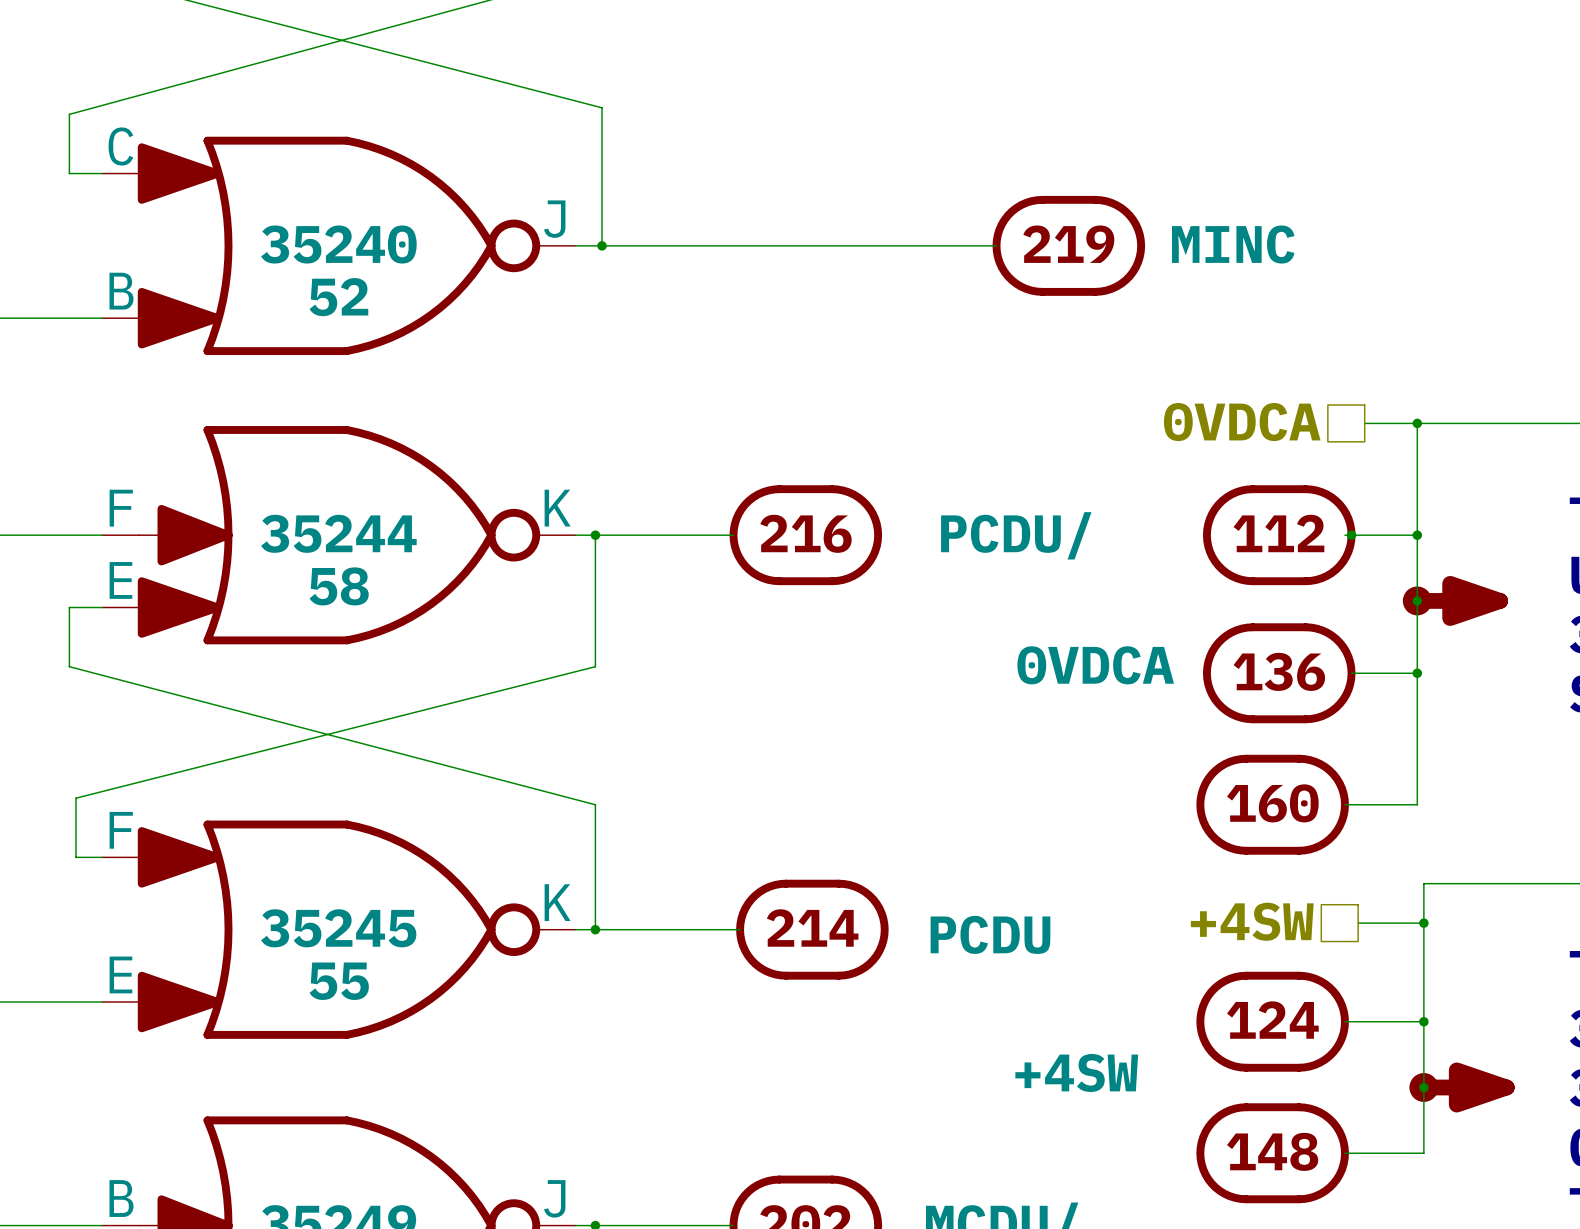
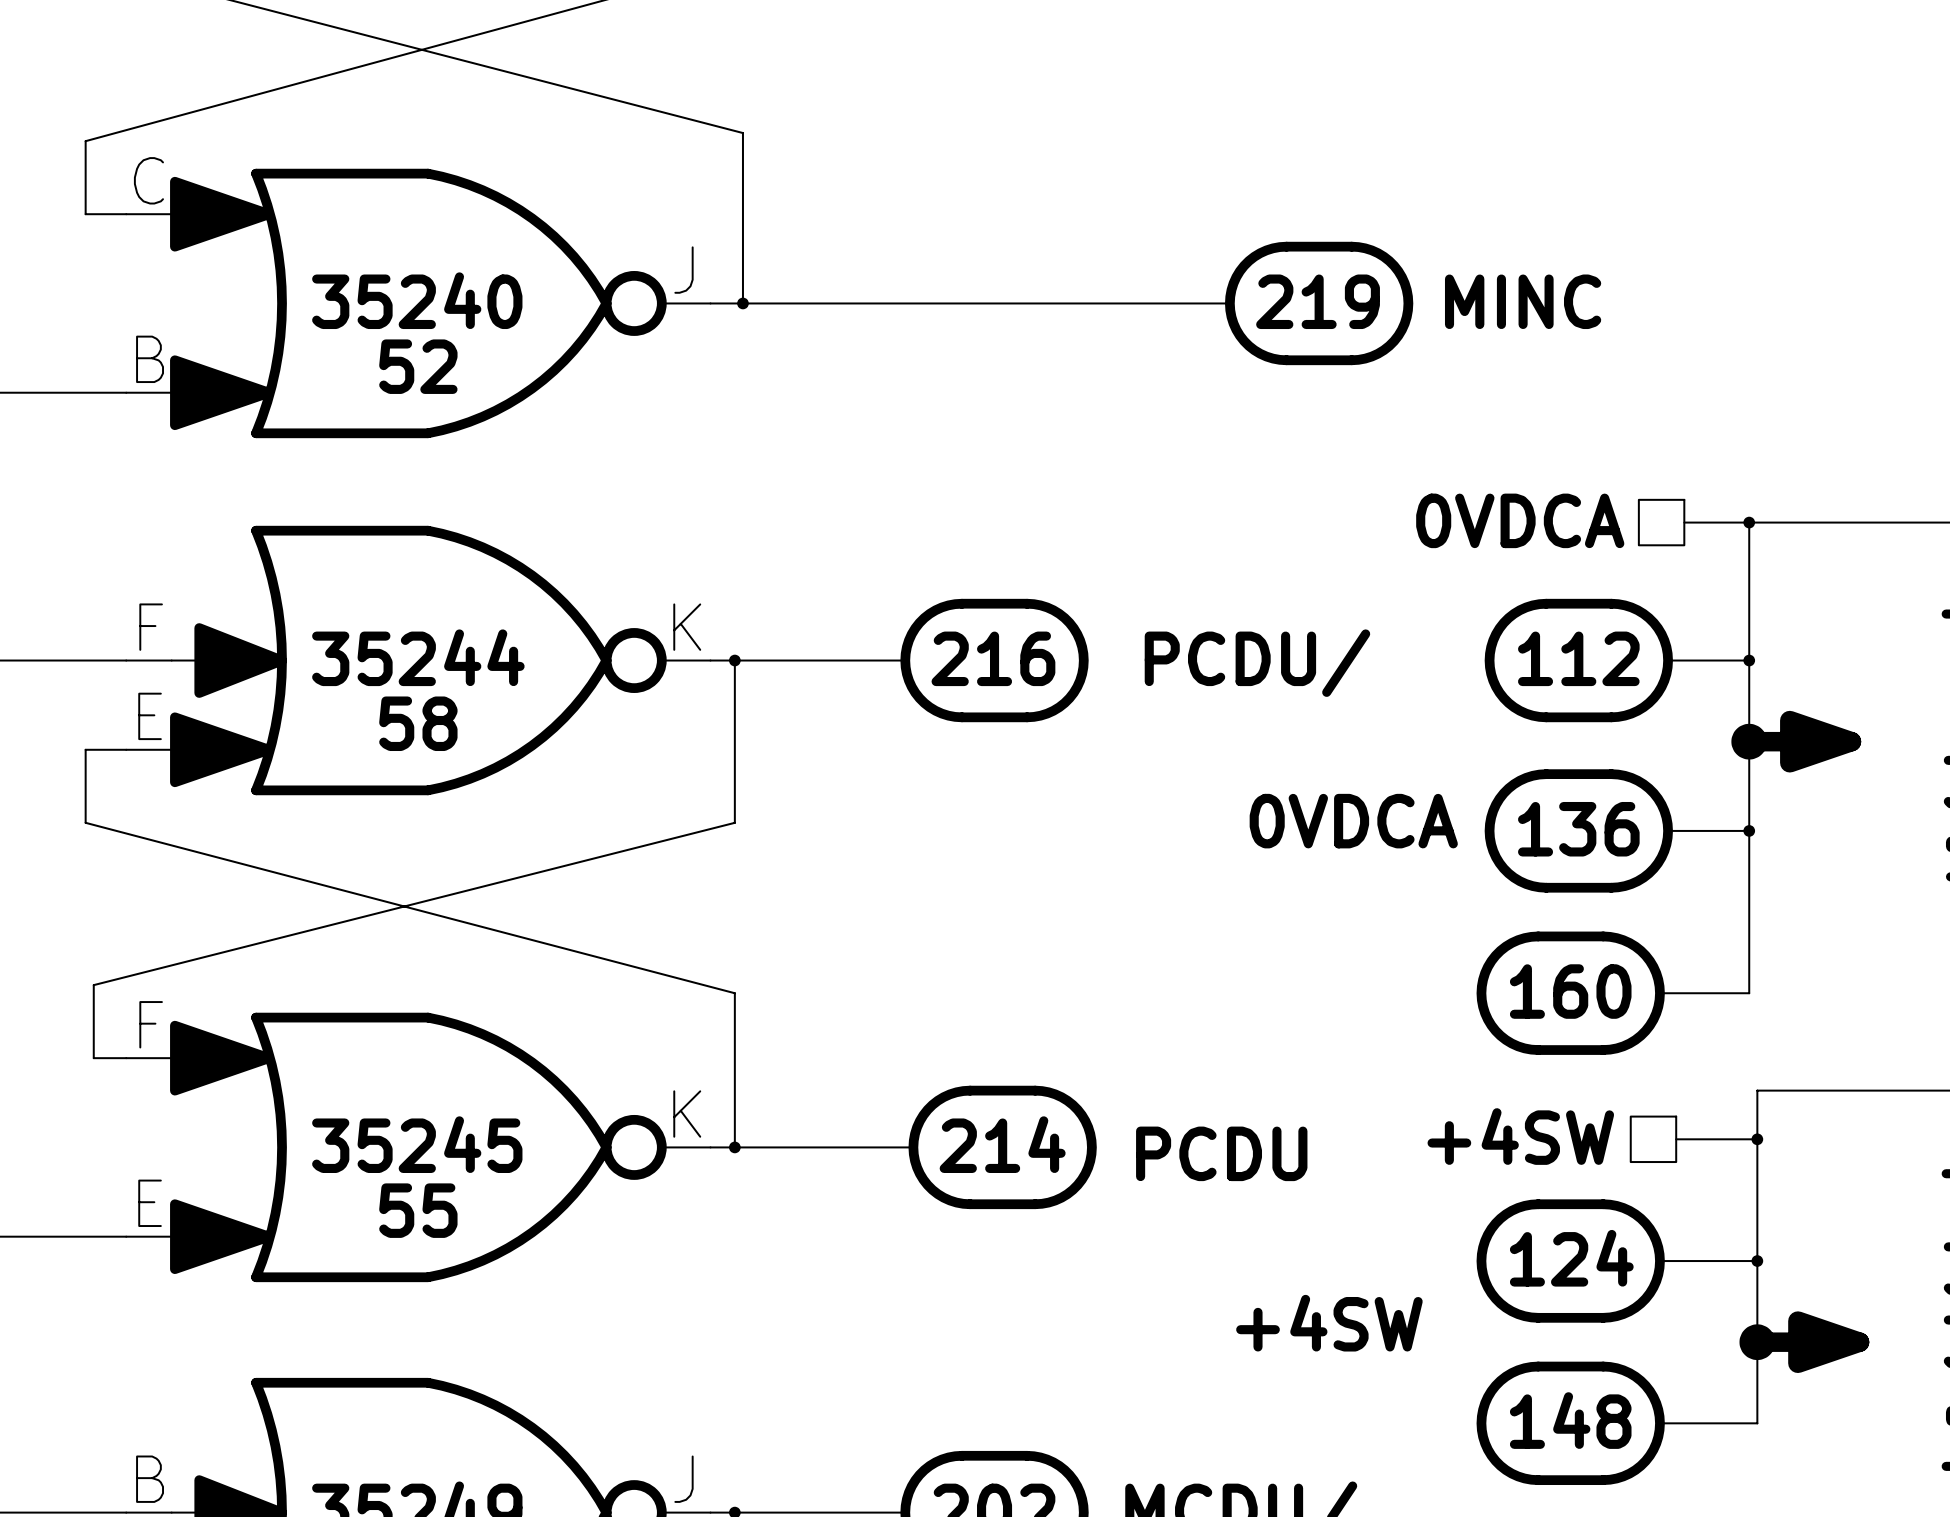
junction: (1351, 535) -> none

